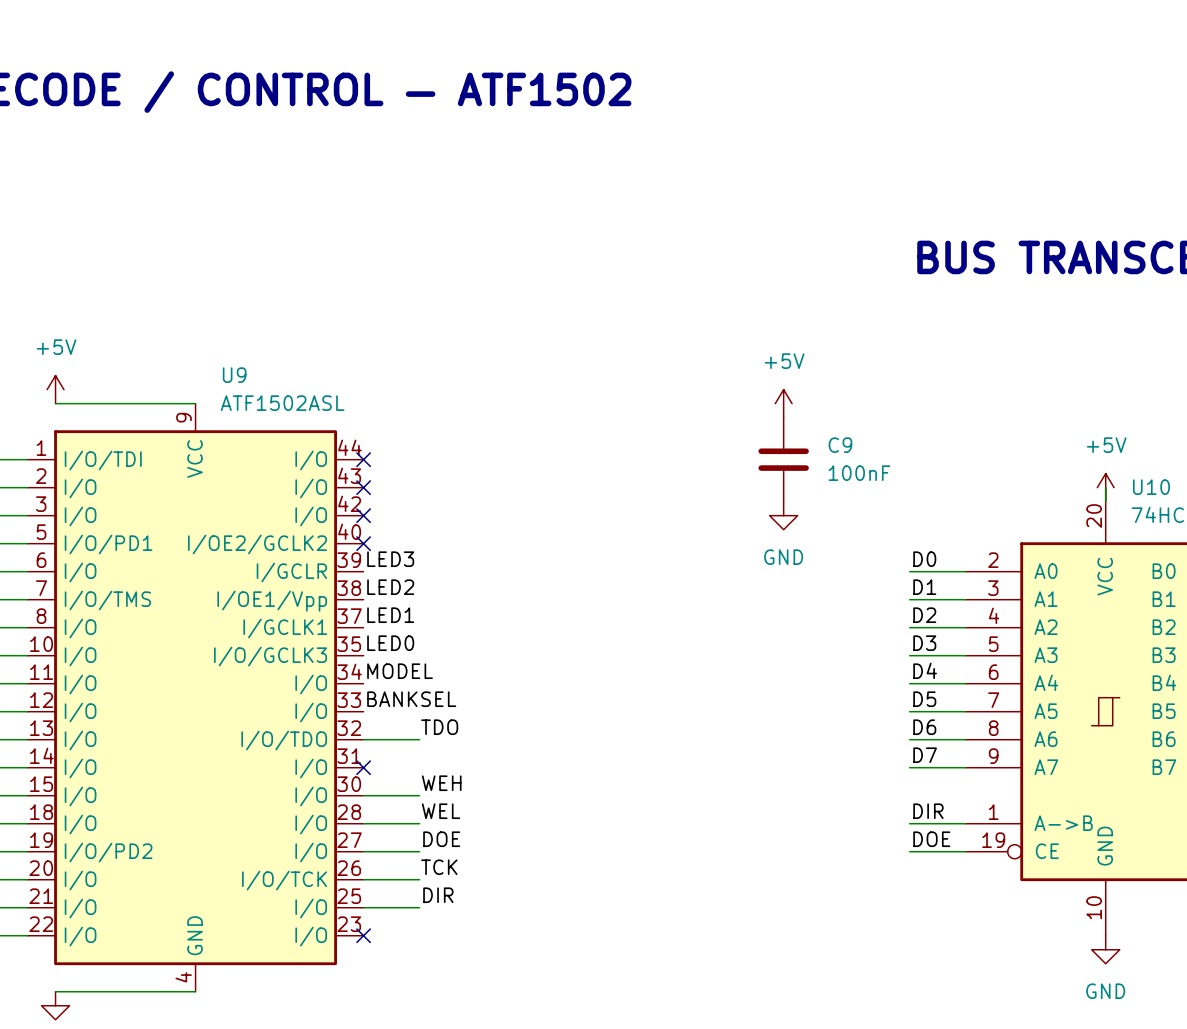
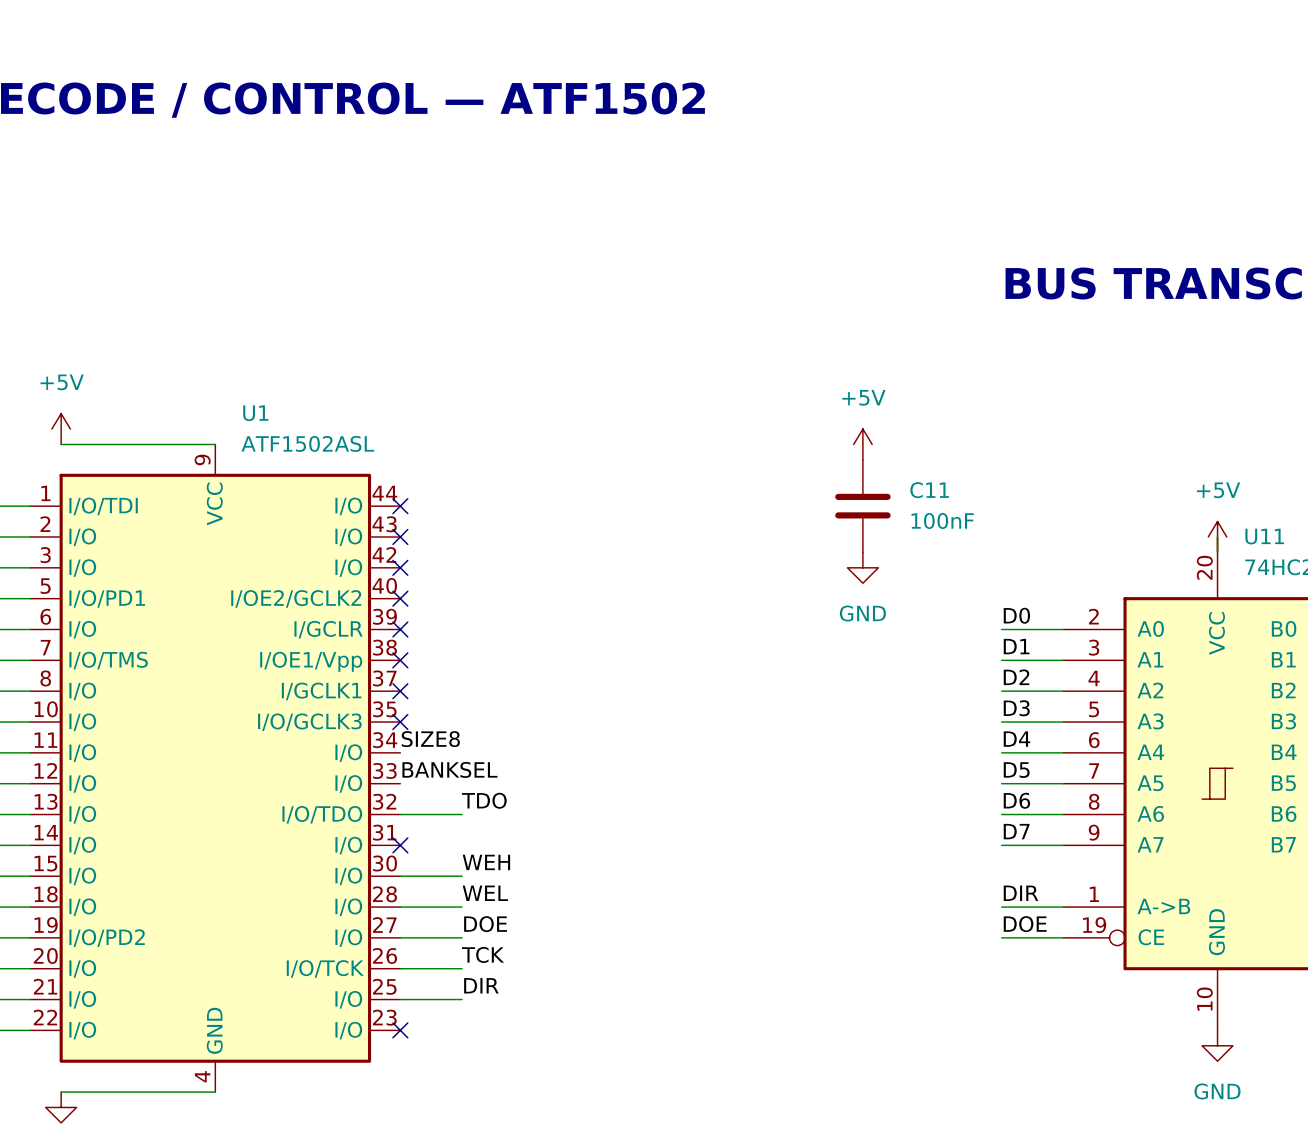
U9 name: U9 (234, 375) -> U1 (255, 413)
C9 name: C9 (840, 445) -> C11 (929, 490)
U10 name: U10 (1151, 487) -> U11 (1264, 536)
label: LED3 (390, 559) -> none
no-connect mark: none -> (400, 629)
label: LED2 (390, 587) -> none
no-connect mark: none -> (400, 660)
label: LED1 (390, 615) -> none
no-connect mark: none -> (400, 691)
label: LED0 (390, 643) -> none
no-connect mark: none -> (400, 722)
label: MODEL (400, 671) -> SIZE8 (430, 739)

